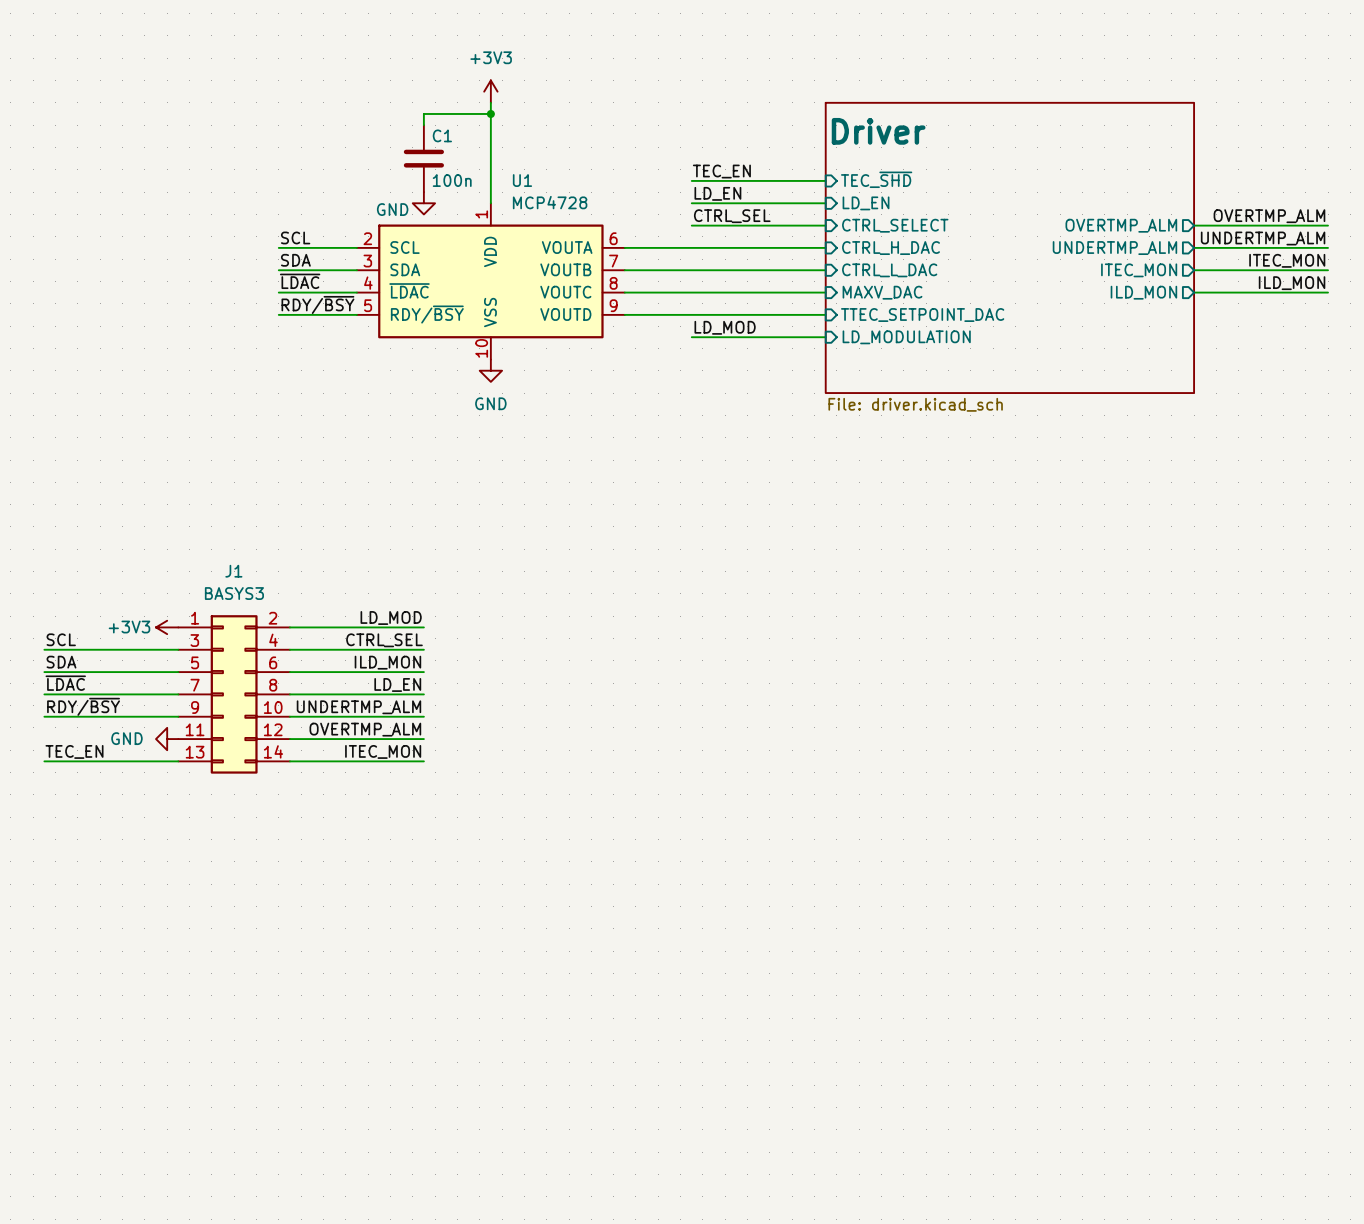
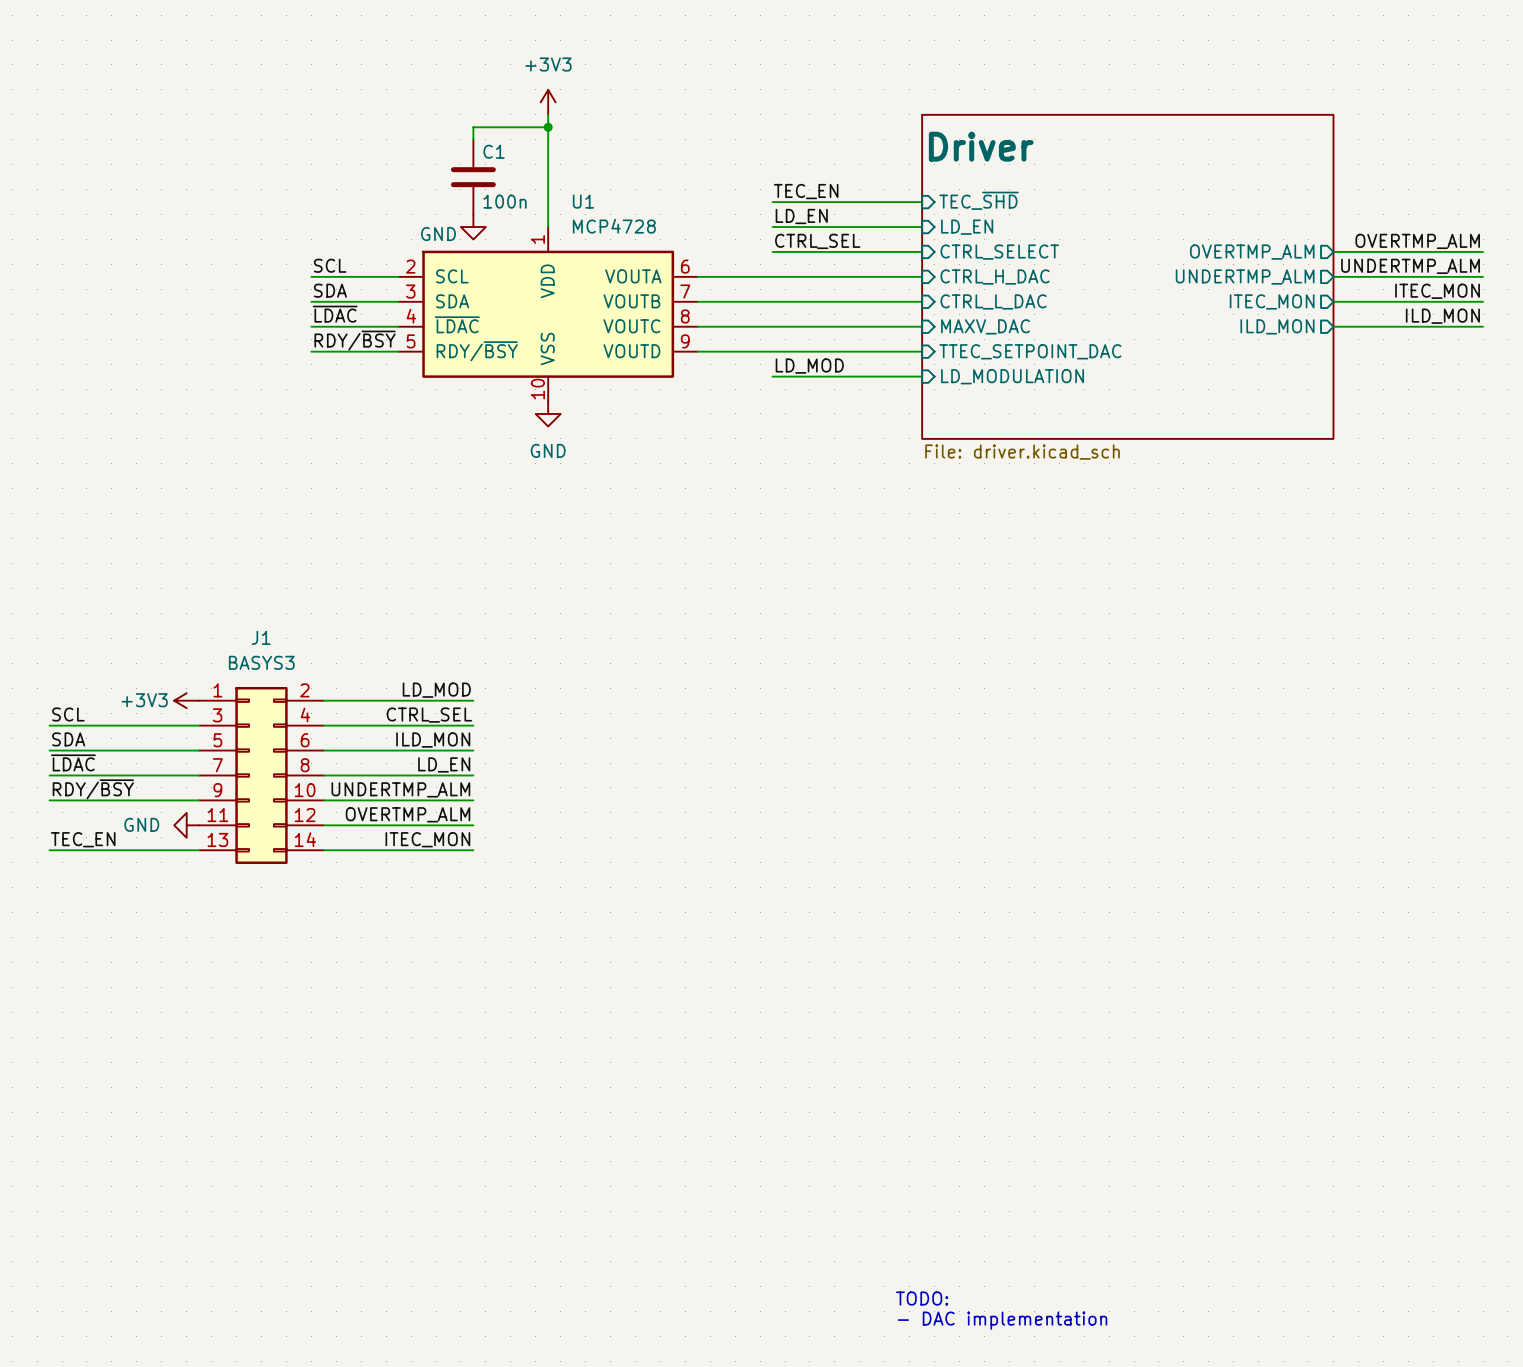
text: none -> TODO: (922, 1298)
text: none -> - DAC implementation (1002, 1320)

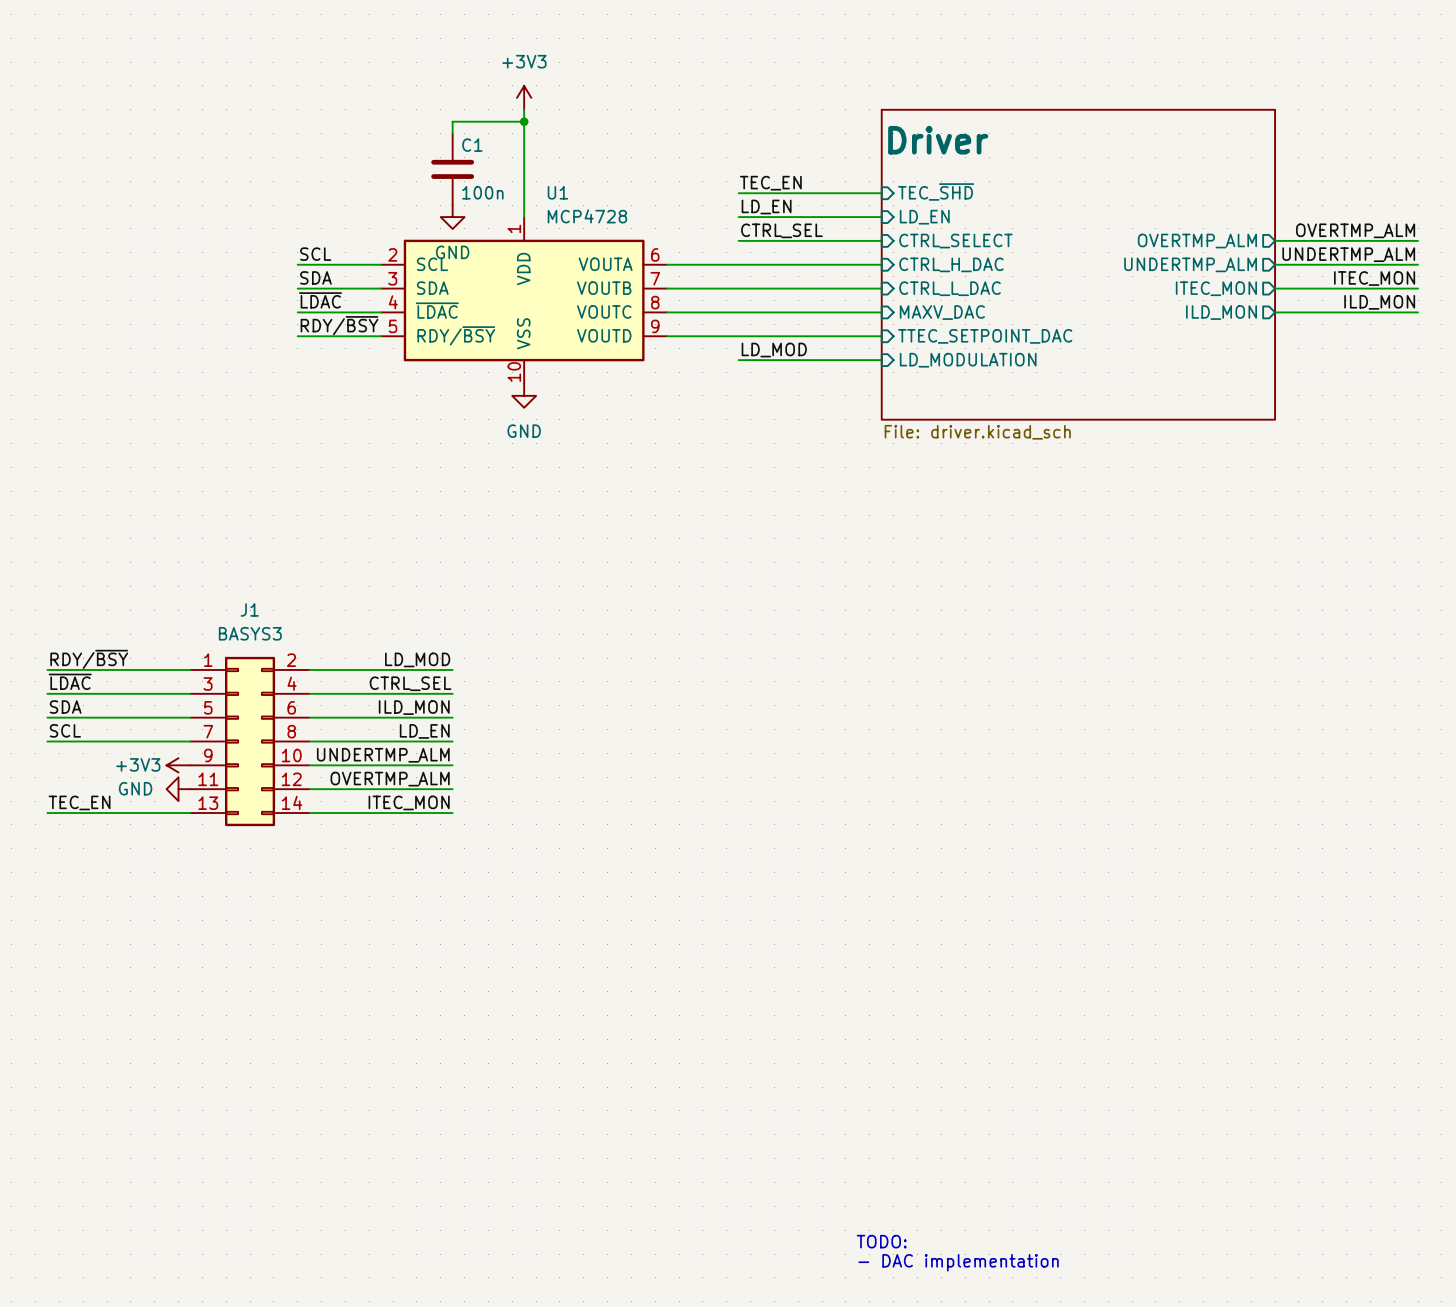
power symbol text position: GND (438, 234) -> GND (452, 252)
power symbol position: +3V3 (186, 700) -> +3V3 (178, 765)
label: SCL (68, 714) -> ~{LDAC} (70, 681)
label: ~{LDAC} (73, 762) -> SCL (65, 730)
label position: RDY/~{BSY} (93, 789) -> RDY/~{BSY} (89, 659)
wire: (49, 800) (199, 800) -> (47, 669) (190, 669)

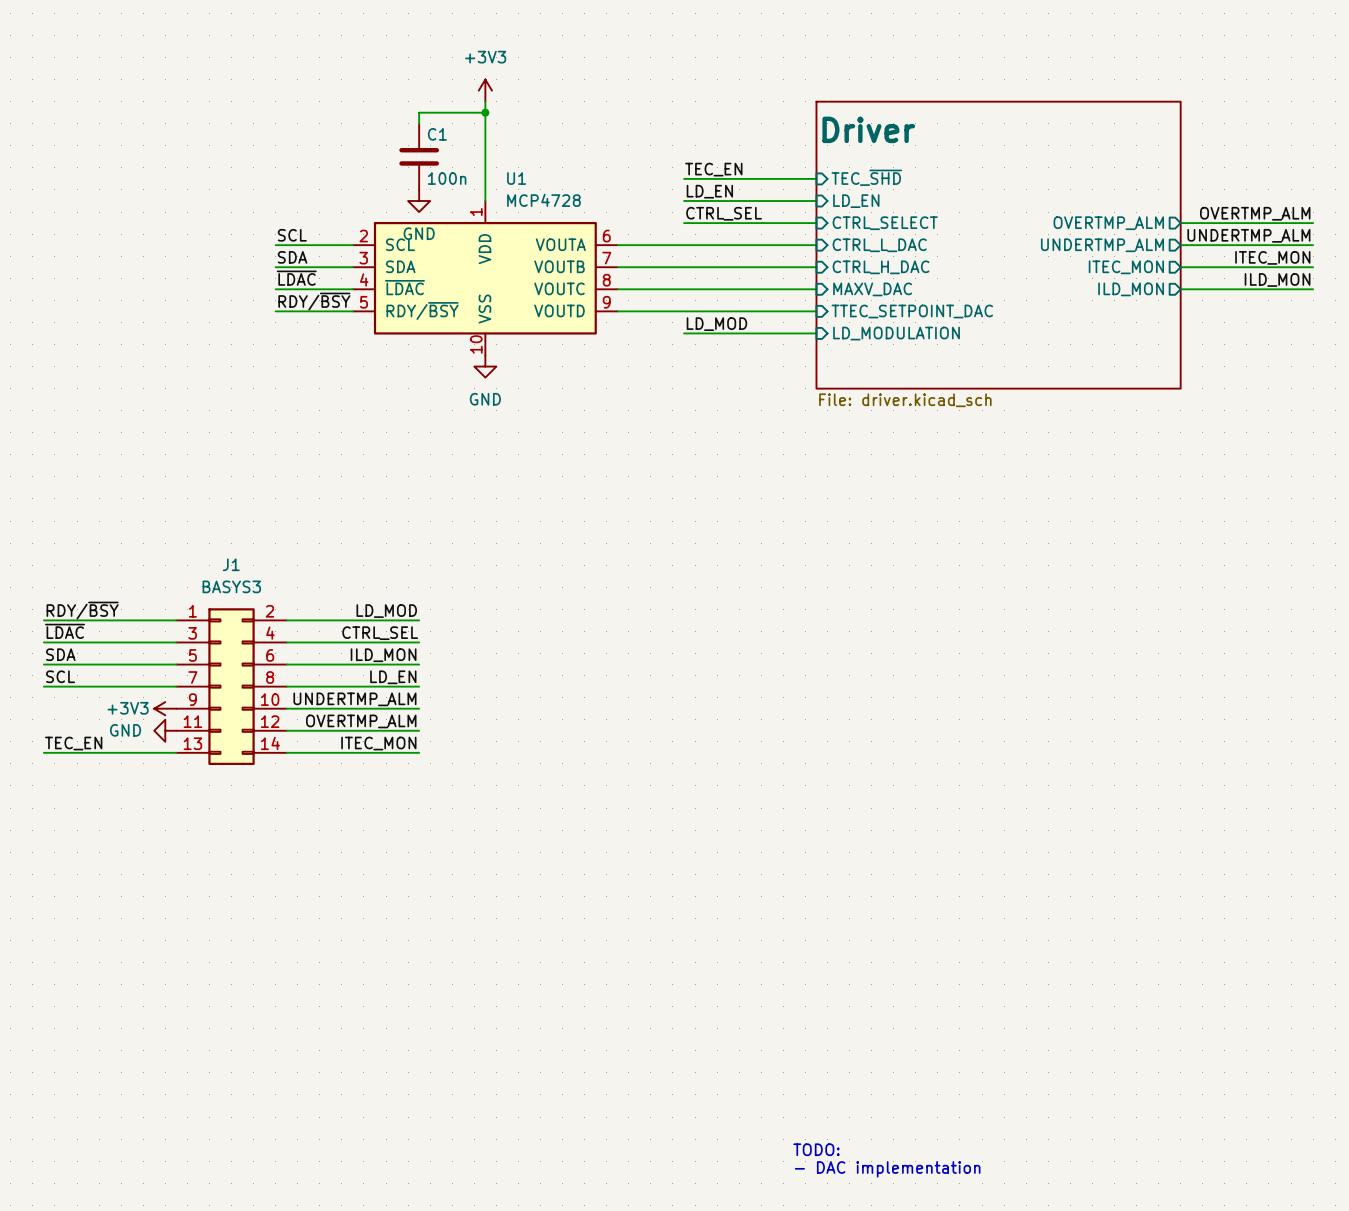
sheet pin: CTRL_H_DAC (951, 264) -> CTRL_L_DAC (879, 245)
sheet pin: CTRL_L_DAC (950, 288) -> CTRL_H_DAC (881, 267)

